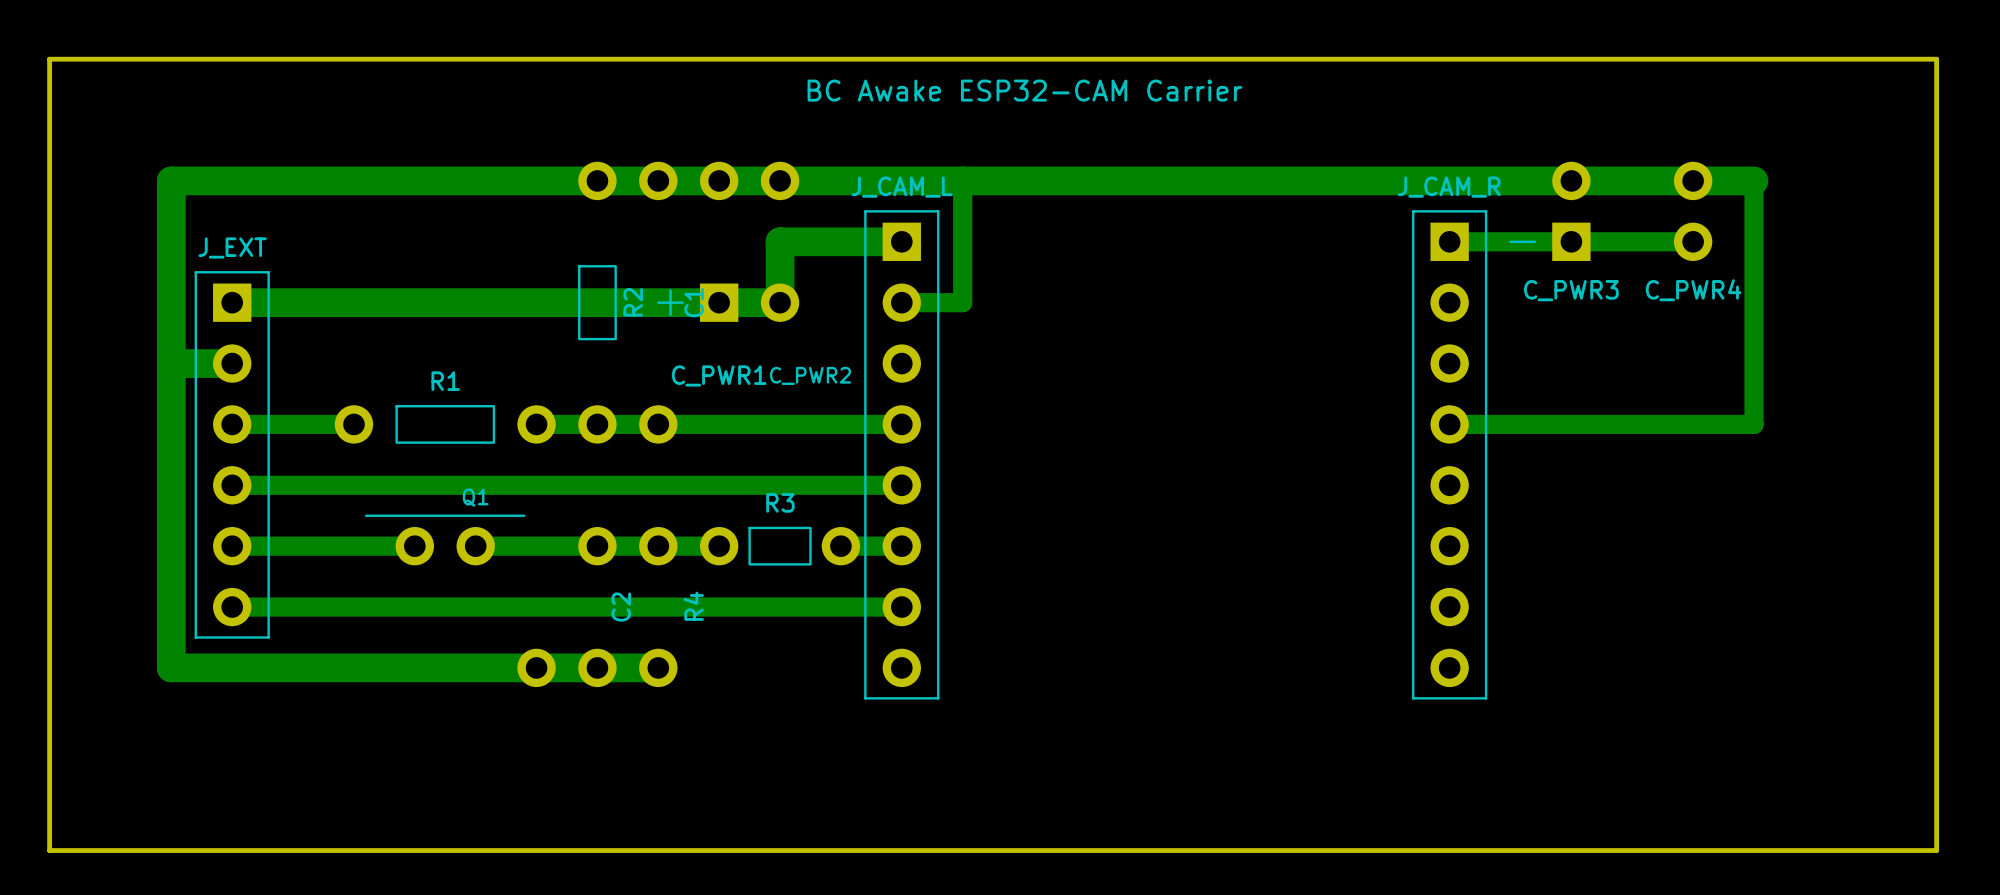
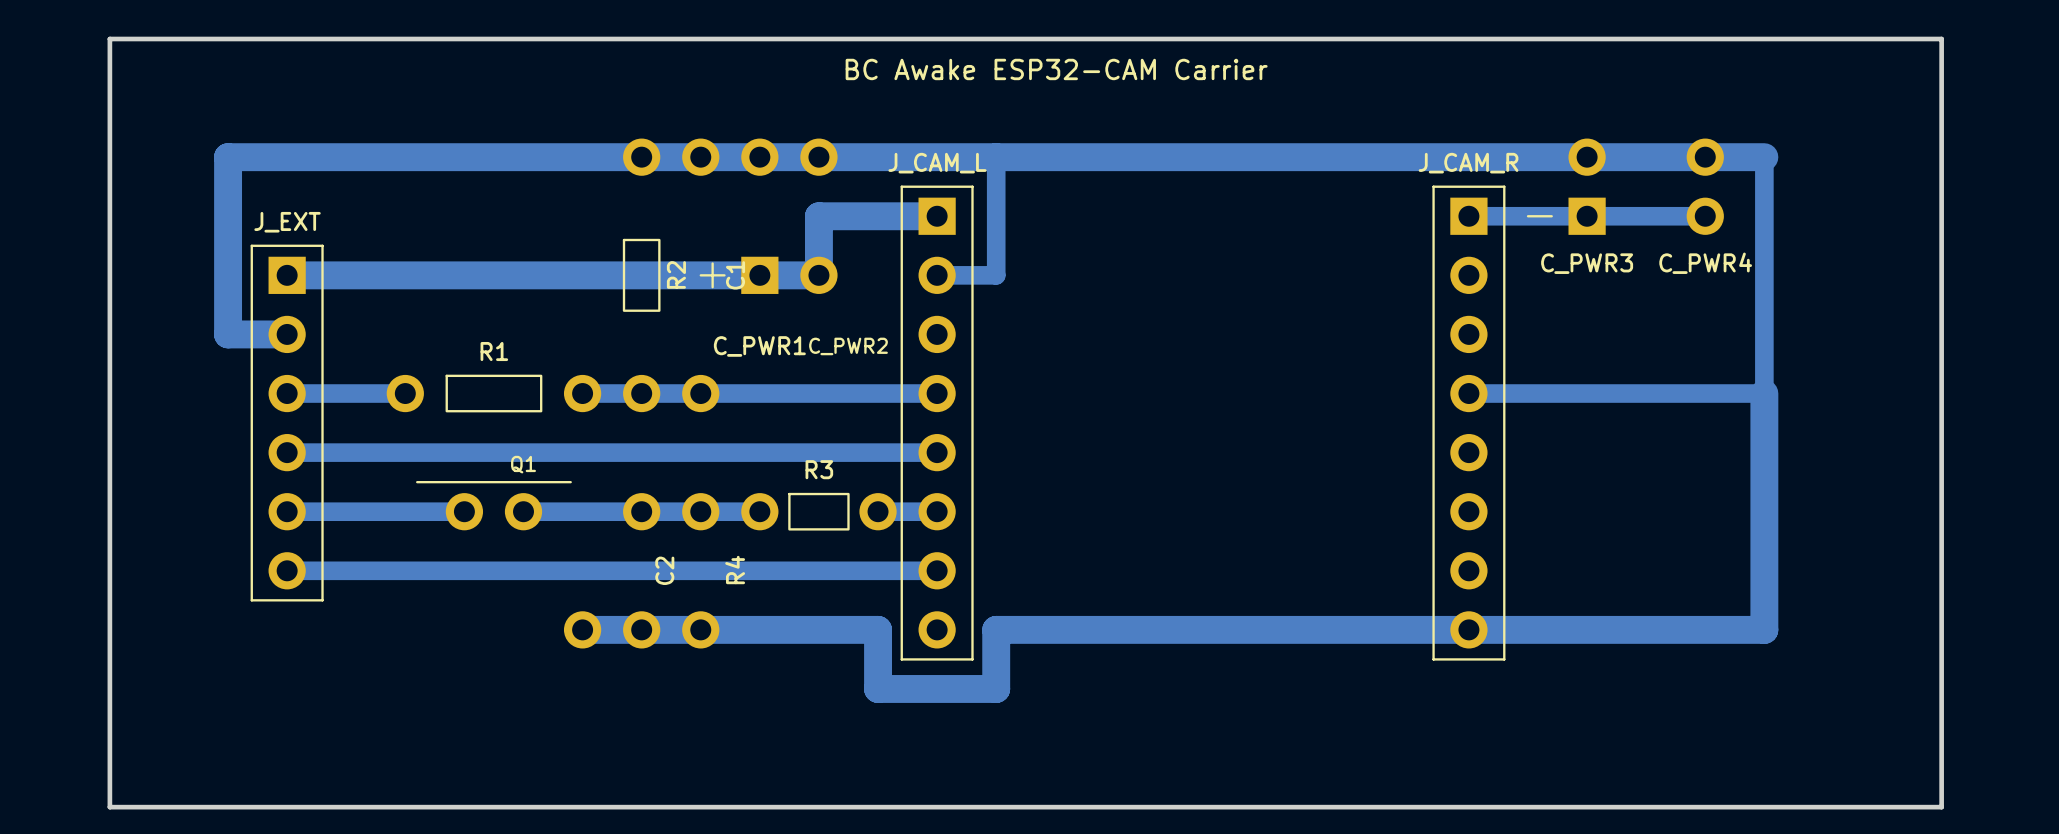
bottom track: (171, 363) (171, 667) (536, 667) -> none
bottom track: none -> (1764, 393) (1764, 629) (996, 629) (996, 688) (878, 688) (878, 629) (700, 629)

